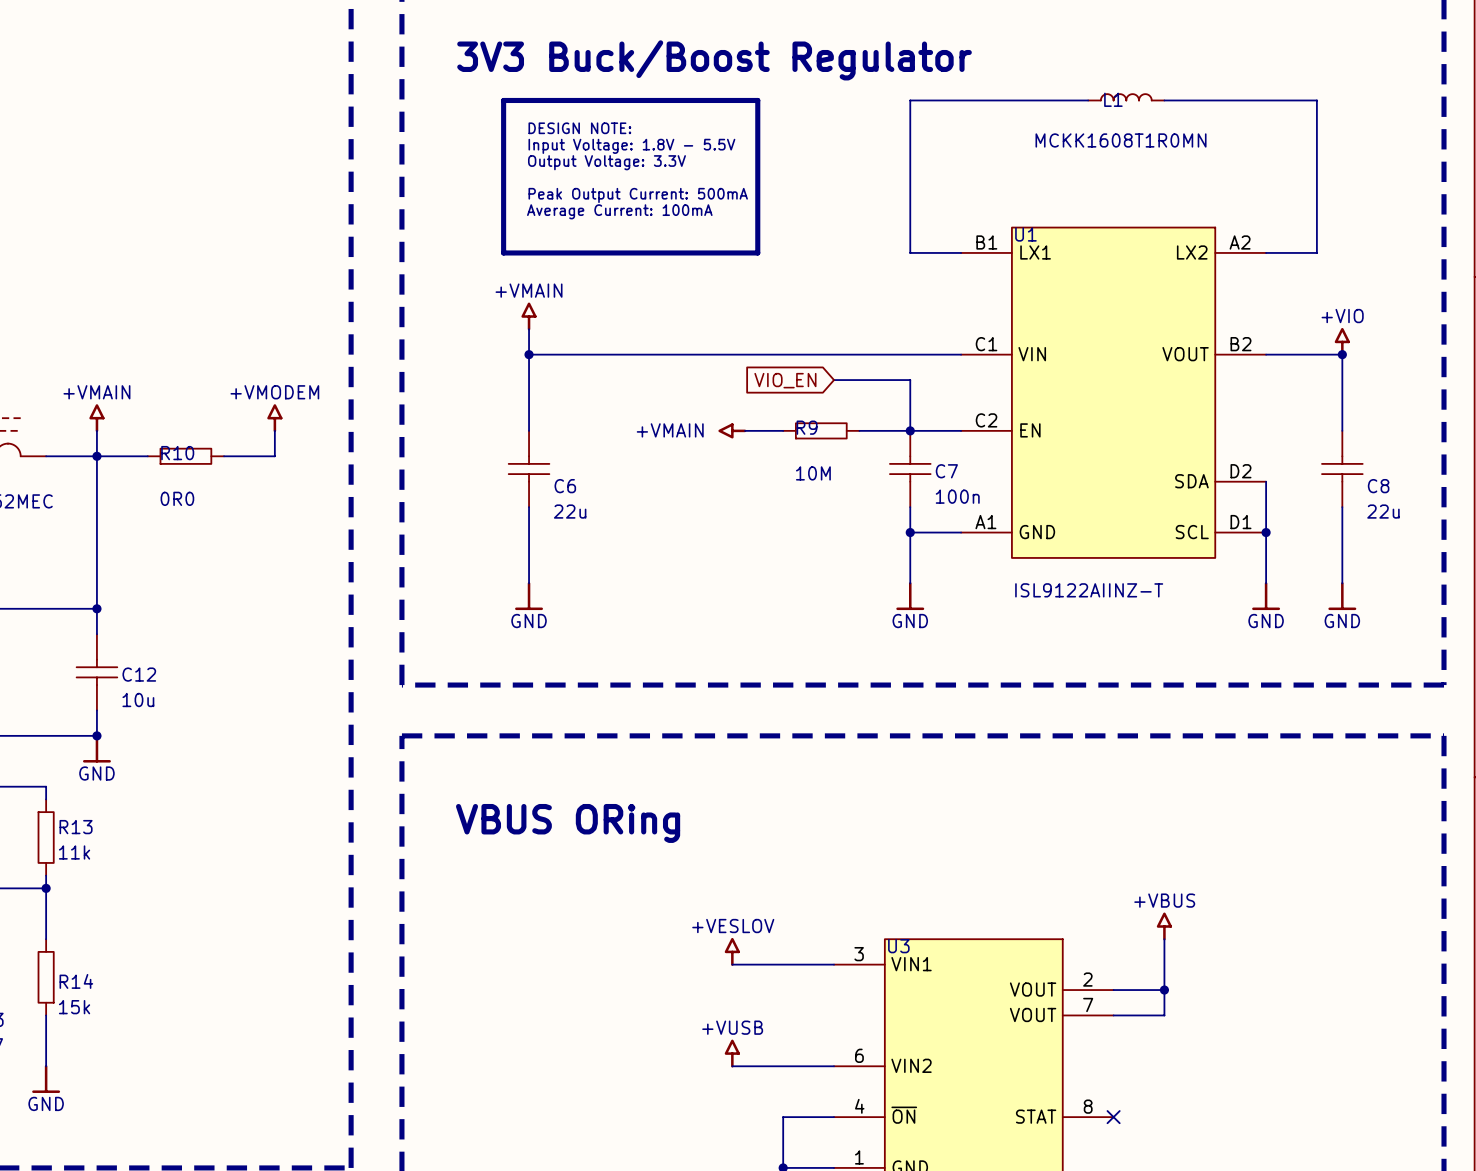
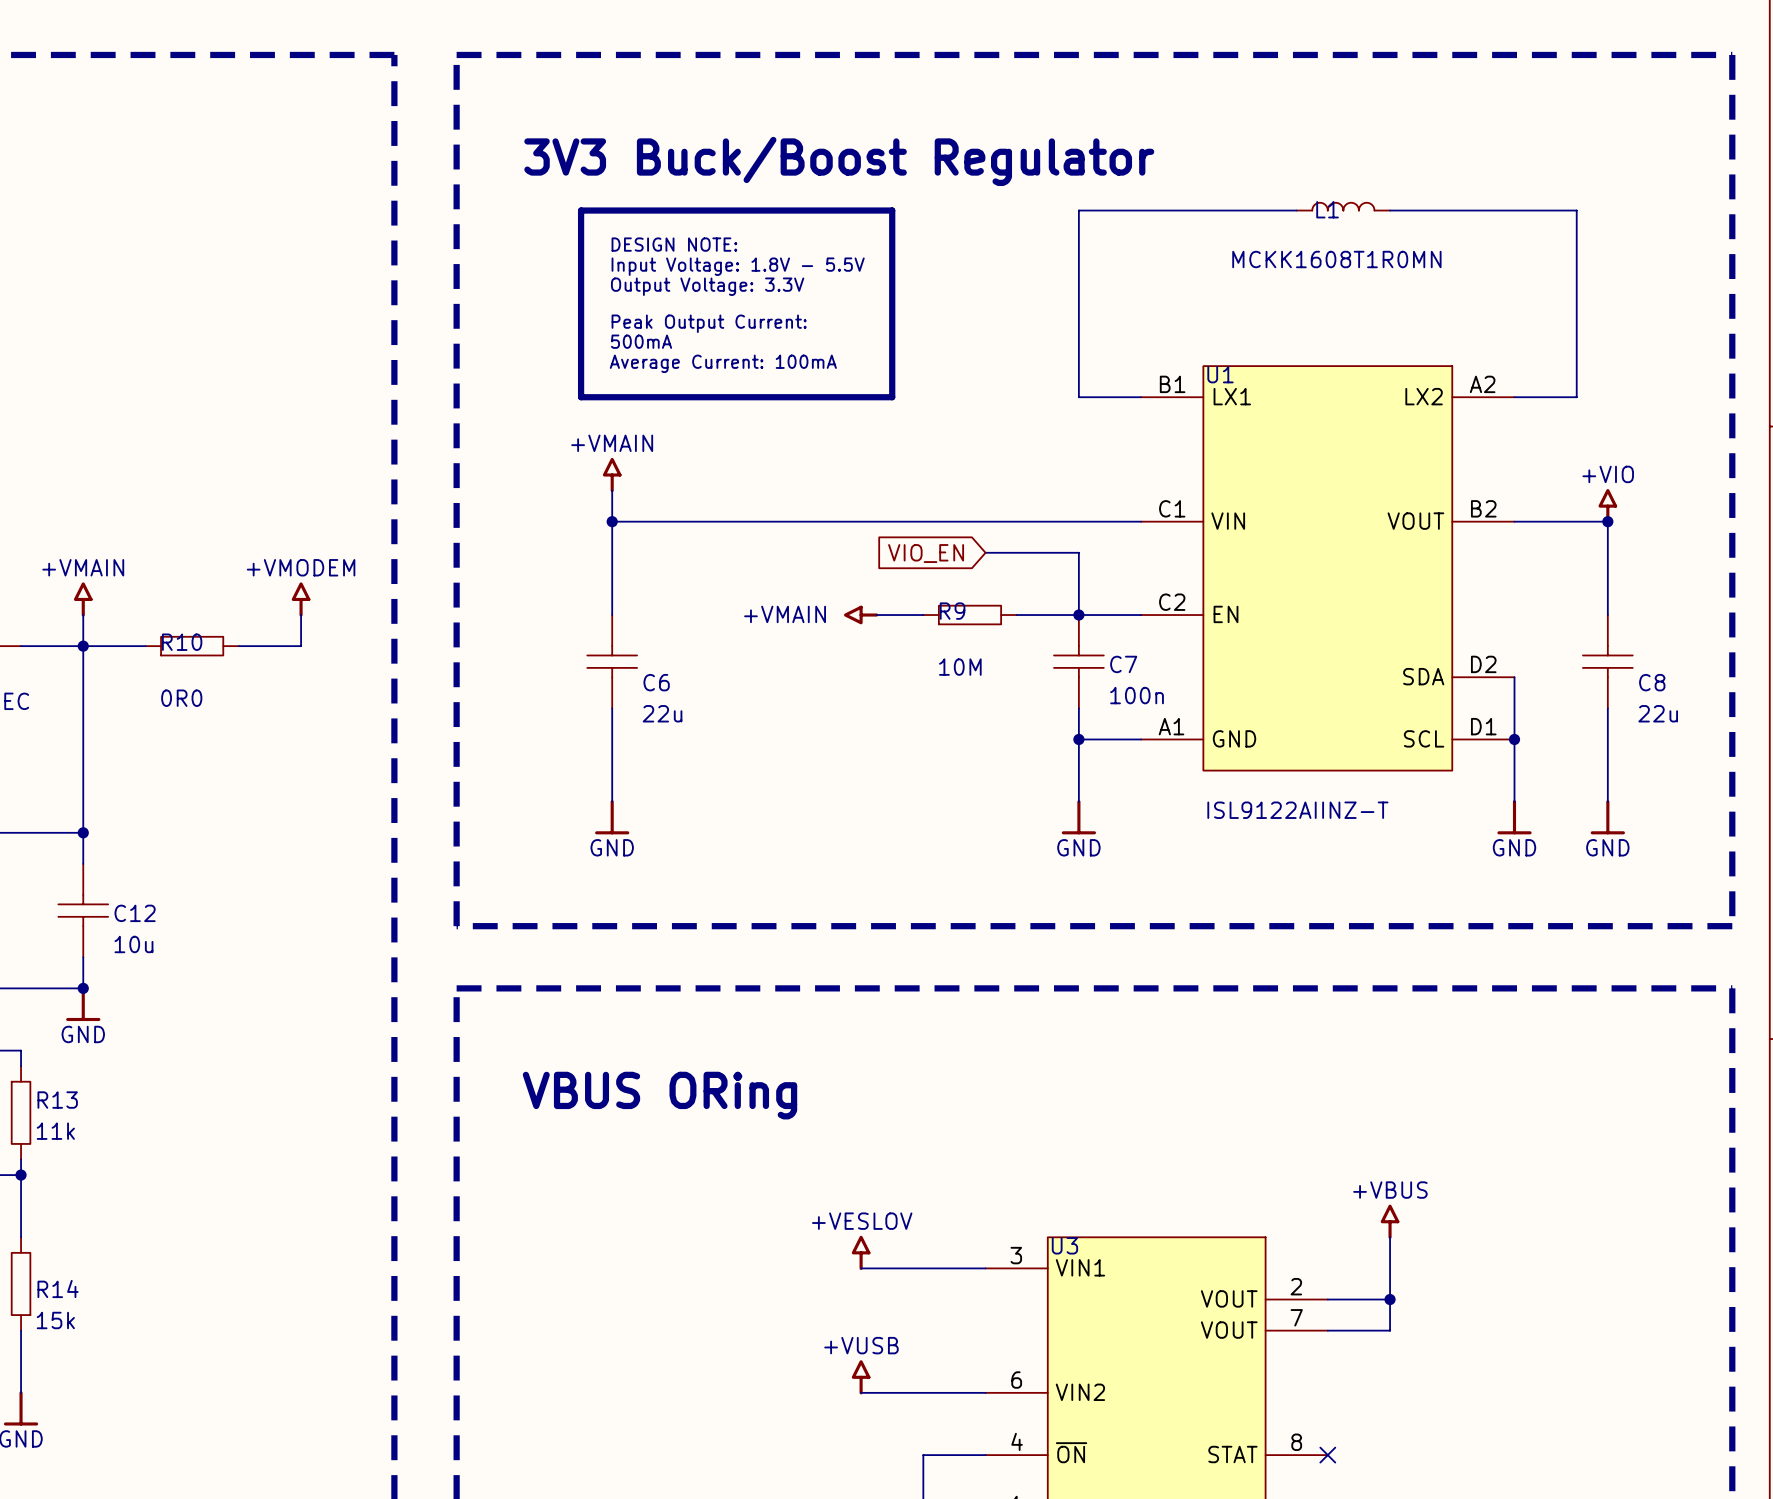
text: Peak Output Current: 500mA (638, 195) -> Peak Output Current: (709, 323)
text: Average Current: 100mA (619, 211) -> 500mA (641, 341)
text: none -> Average Current: 100mA (723, 363)

